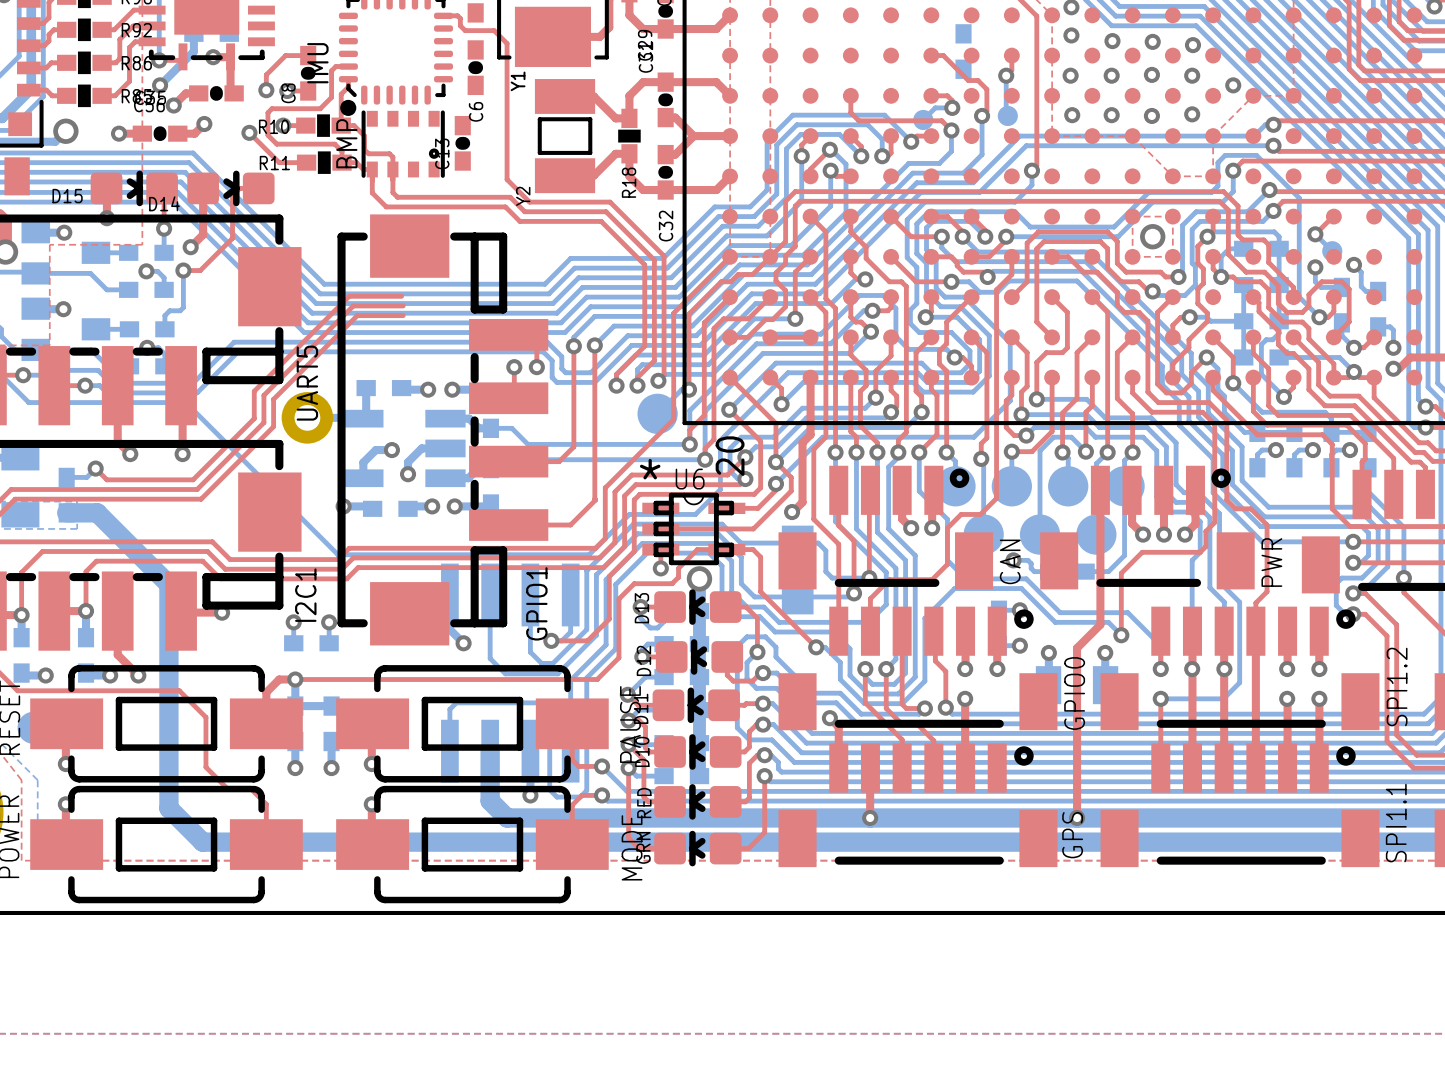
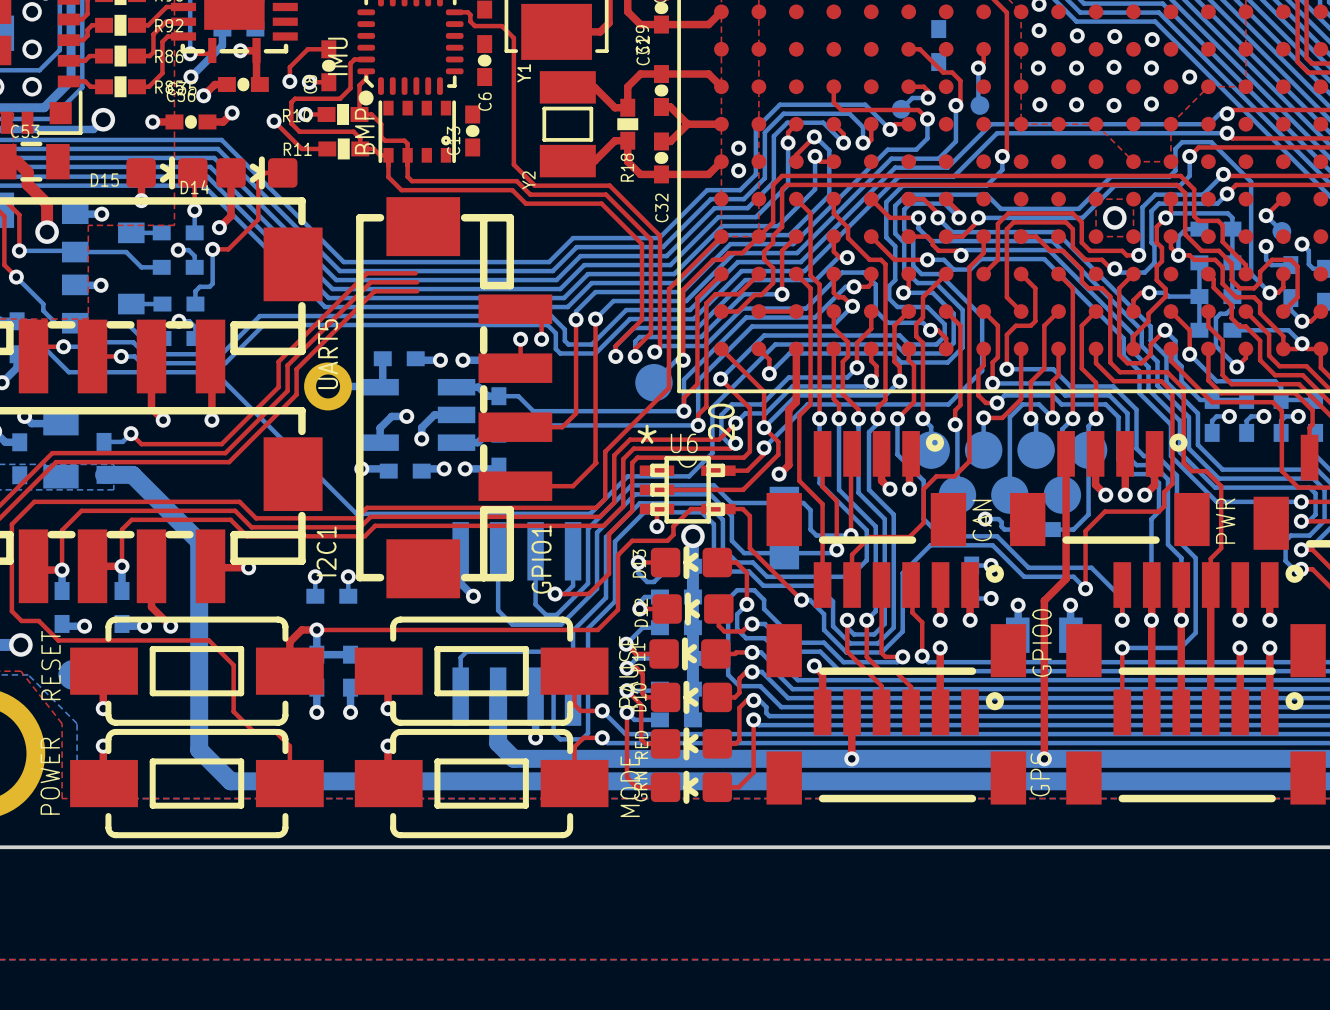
via: none -> (738, 148)
via: none -> (738, 170)

